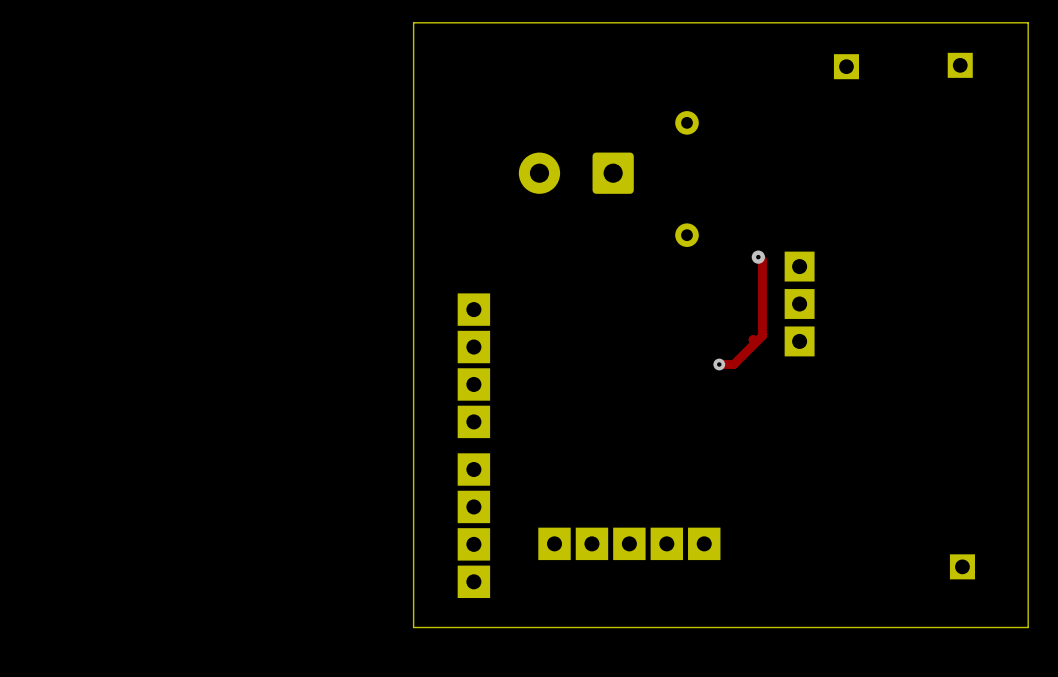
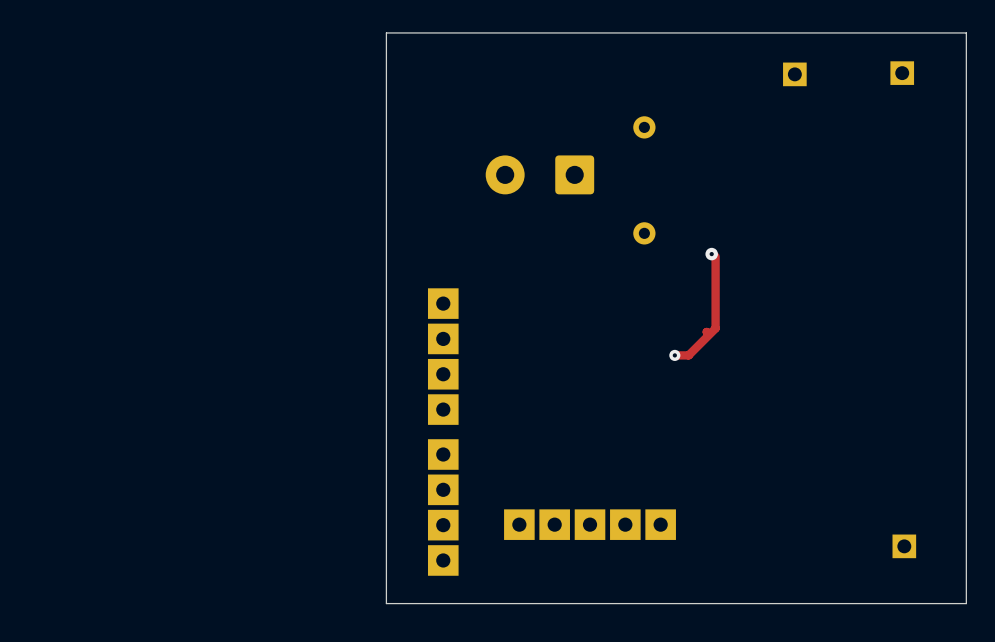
part: (799, 304) -> none

